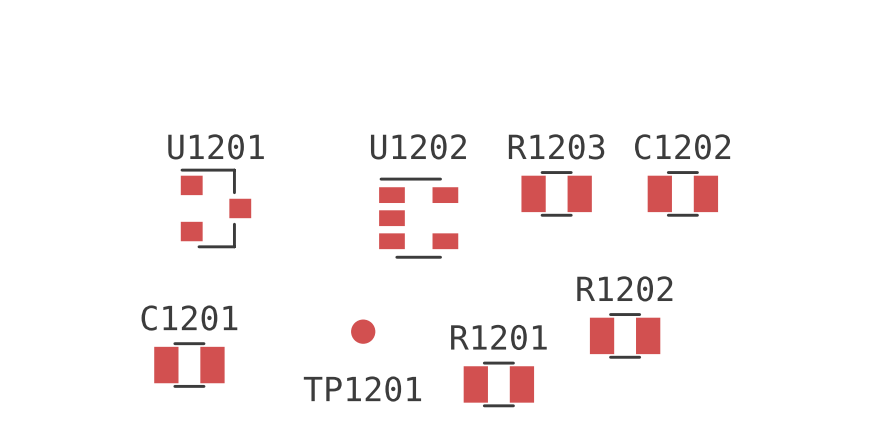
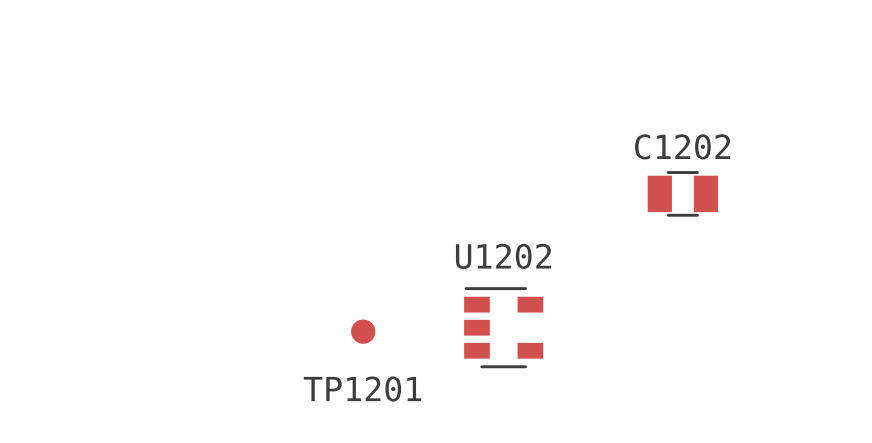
R1203: (556, 193) -> none
U1201: (215, 208) -> none
U1202 position: (418, 218) -> (503, 327)
R1202: (625, 335) -> none
C1201: (189, 365) -> none
R1201: (498, 384) -> none

